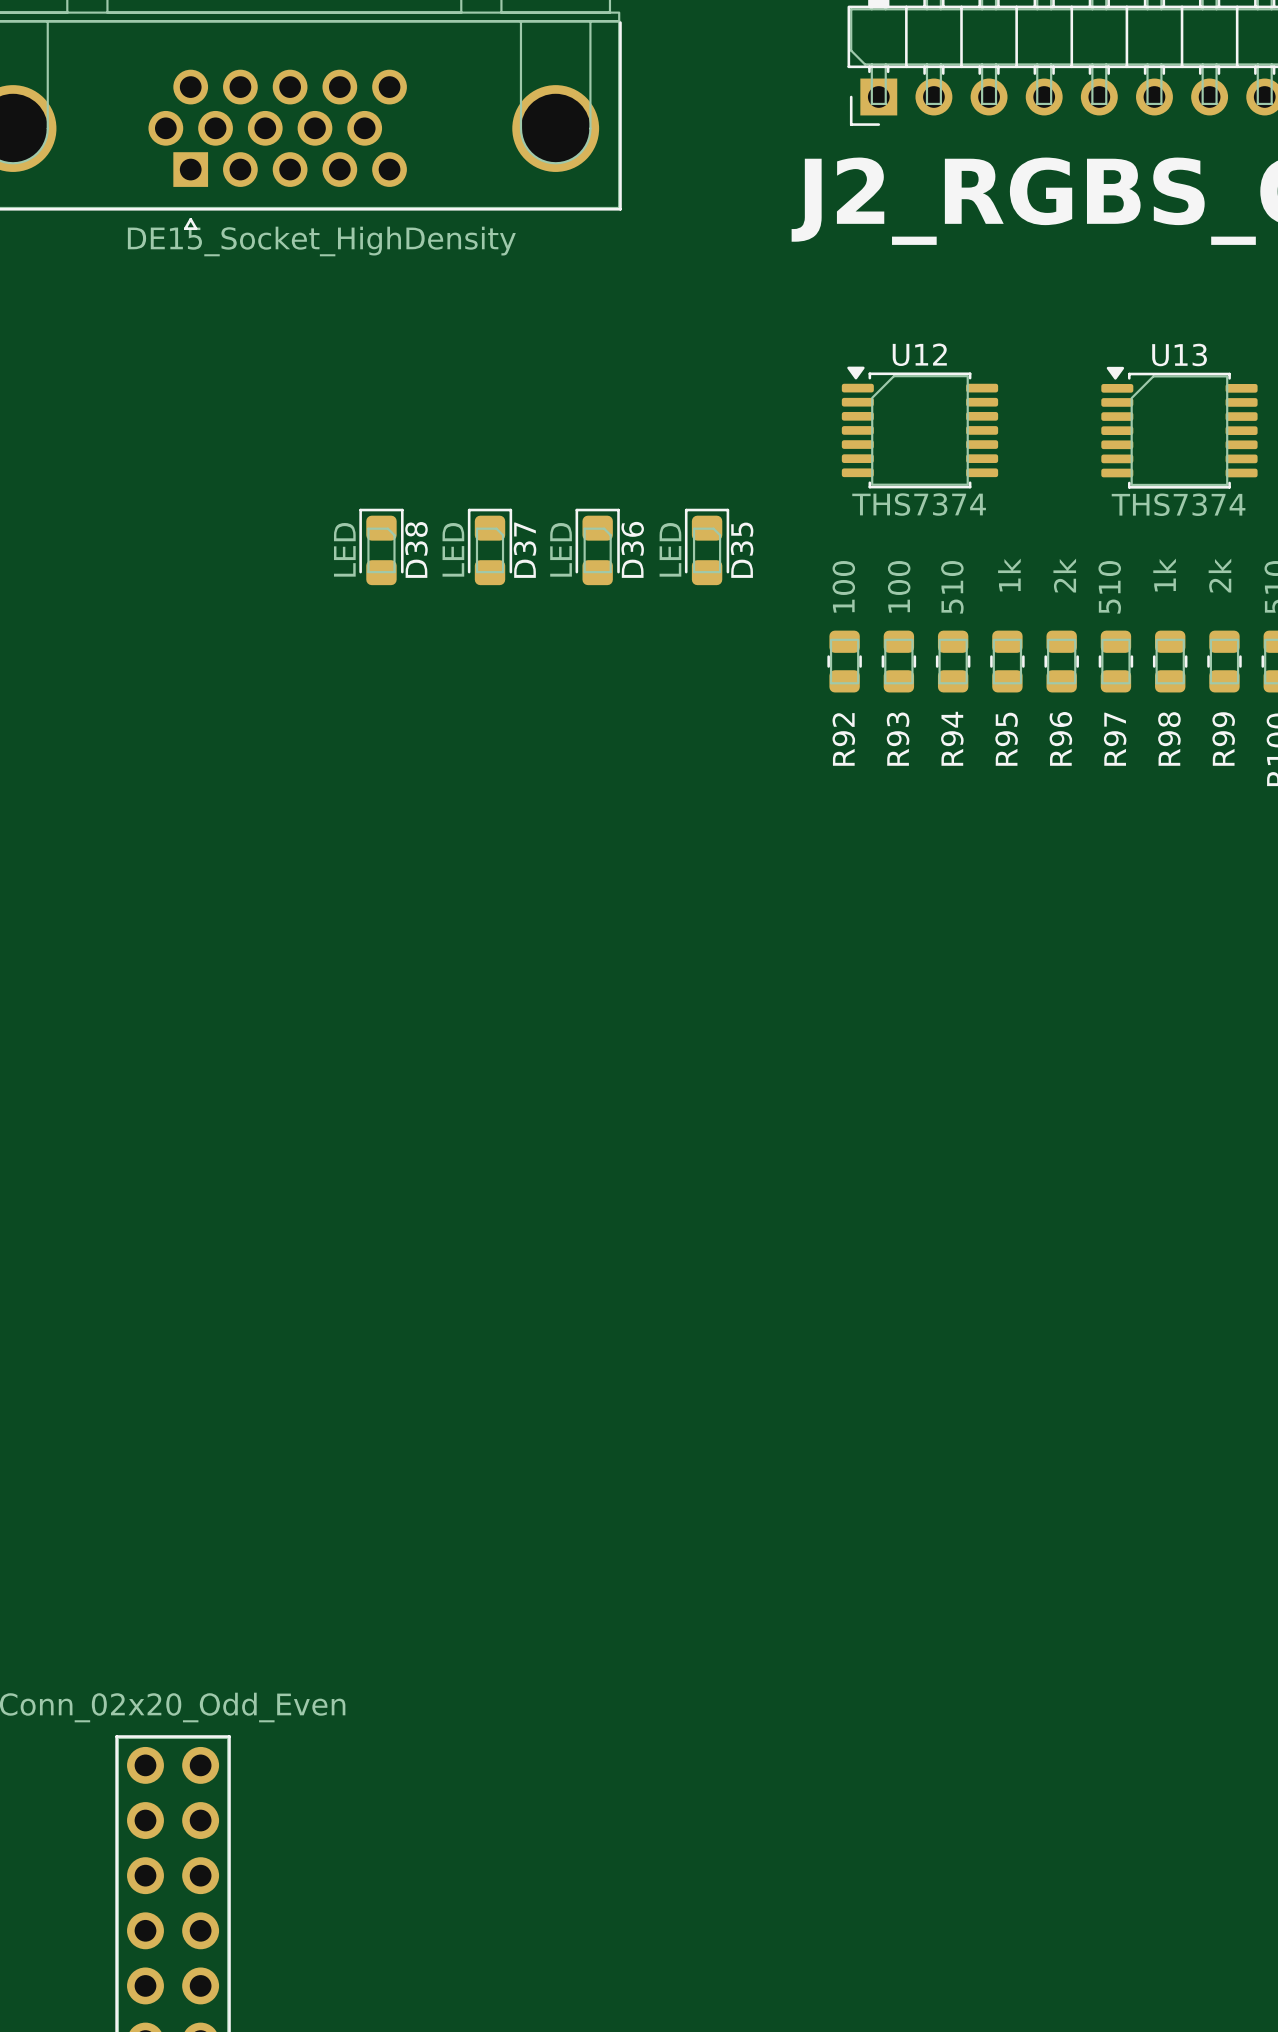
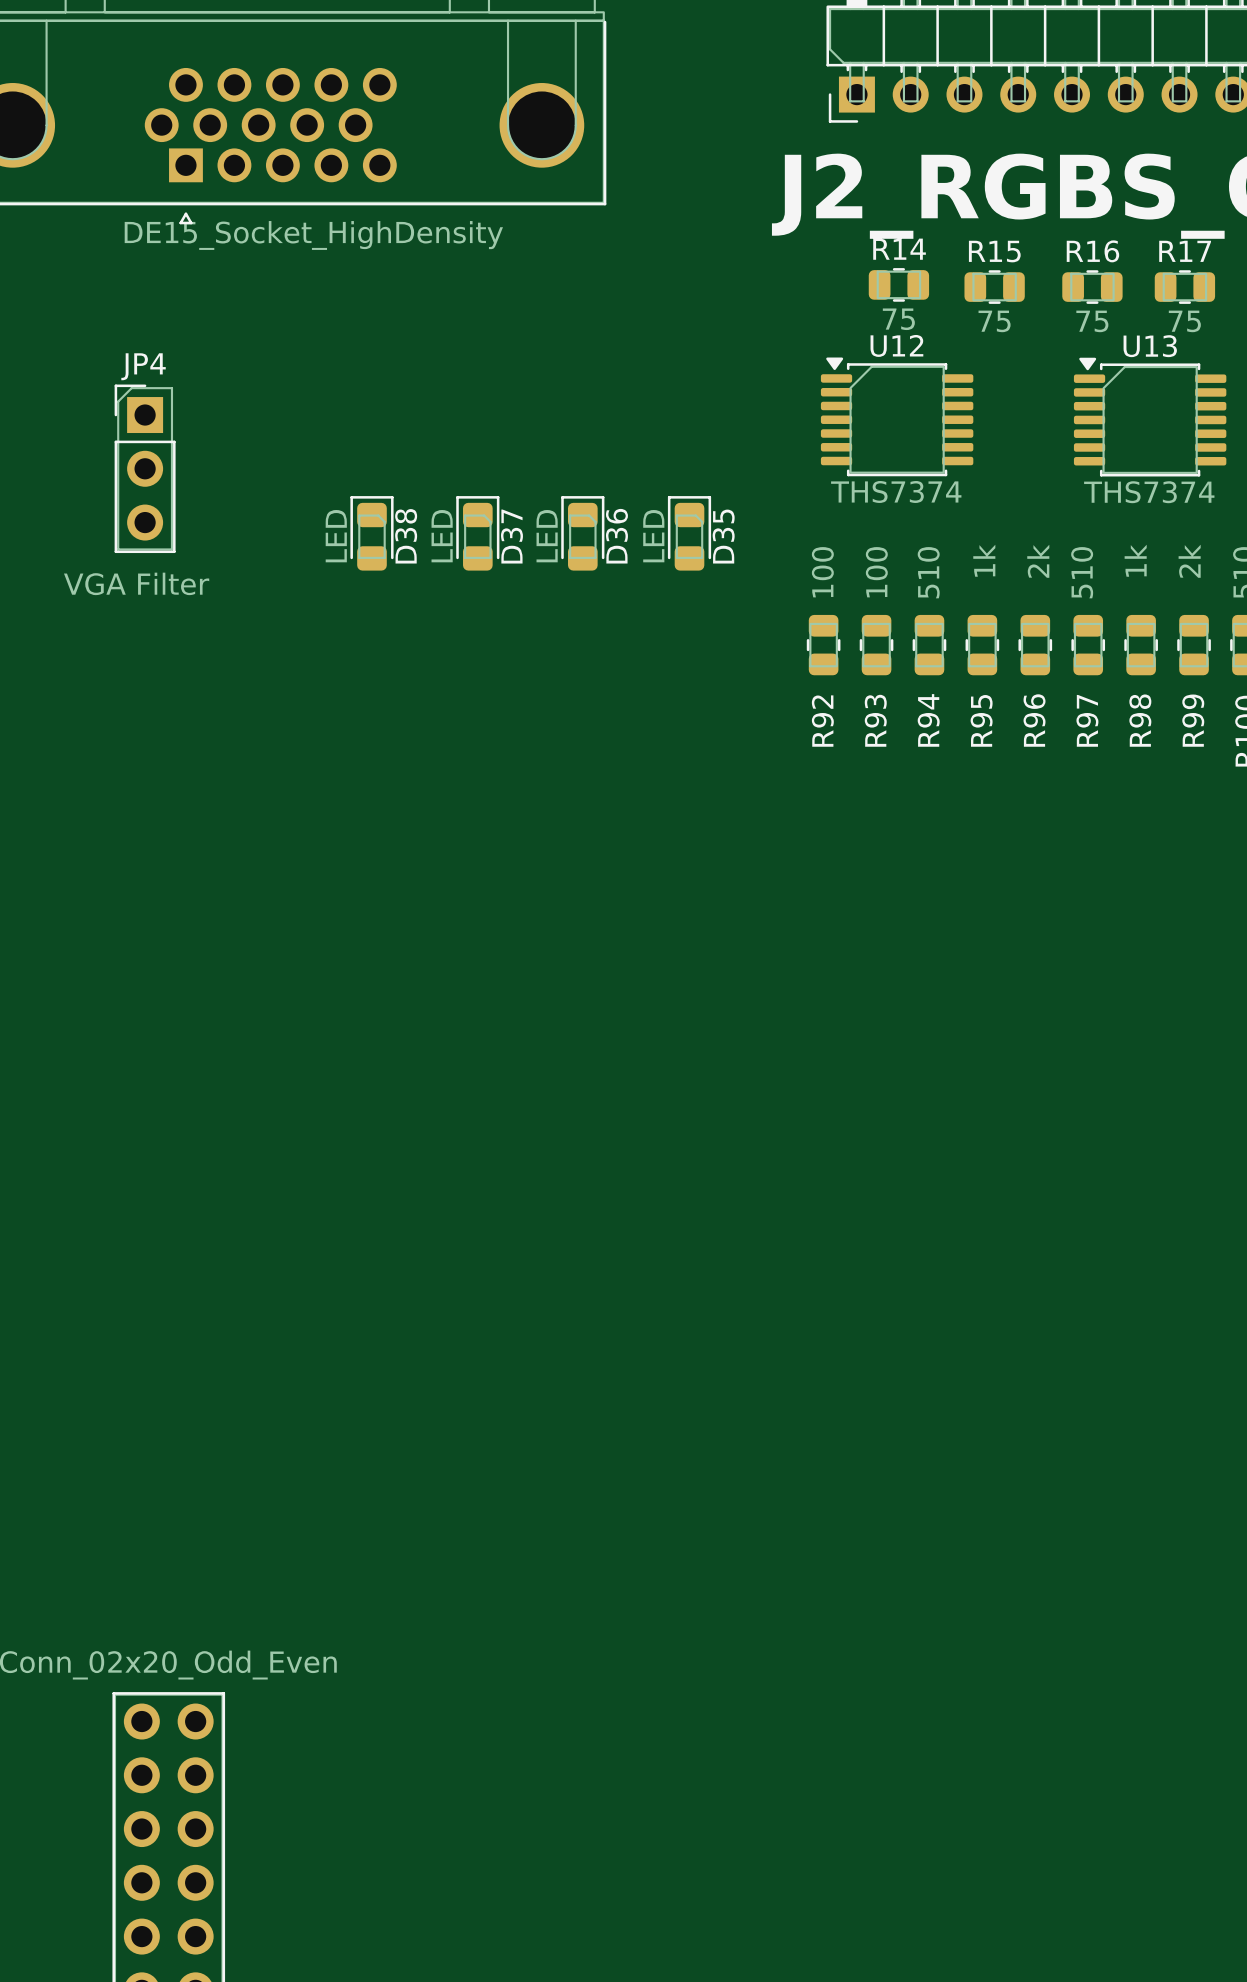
R14: none -> 75 (898, 284)
R15: none -> 75 (994, 287)
R16: none -> 75 (1092, 287)
R17: none -> 75 (1184, 287)
JP4: none -> VGA Filter (145, 468)

